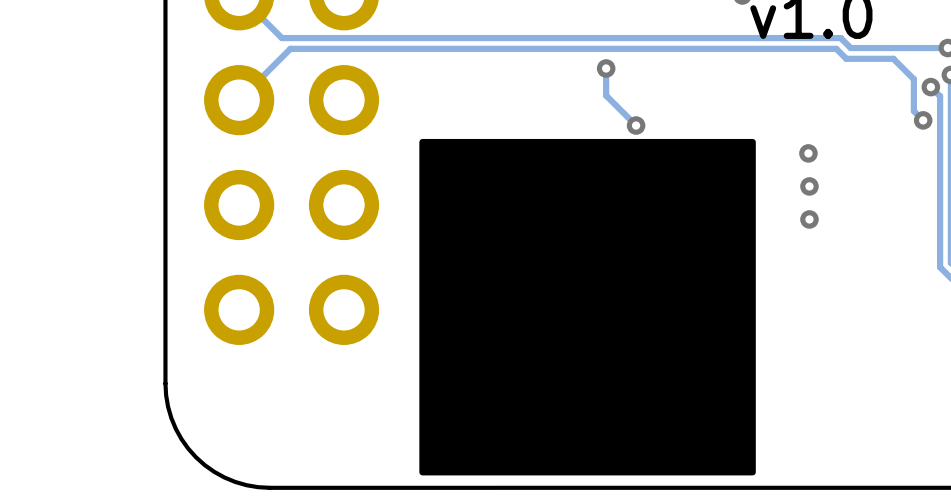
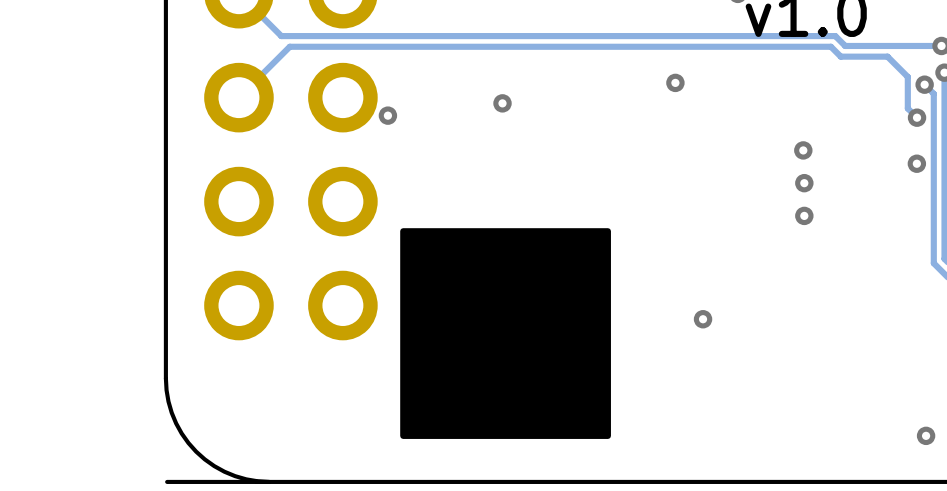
track: (606, 68) (606, 95) (636, 125) -> none
via: (606, 68) -> none
via: none -> (675, 82)
via: none -> (502, 103)
via: none -> (387, 115)
via: (636, 125) -> none
drawing: [419, 138, 756, 476] -> none
via: none -> (916, 163)
drawing: none -> [400, 228, 611, 439]
via: none -> (703, 319)
via: none -> (926, 435)
board edge: none -> (269, 481) (167, 481)

